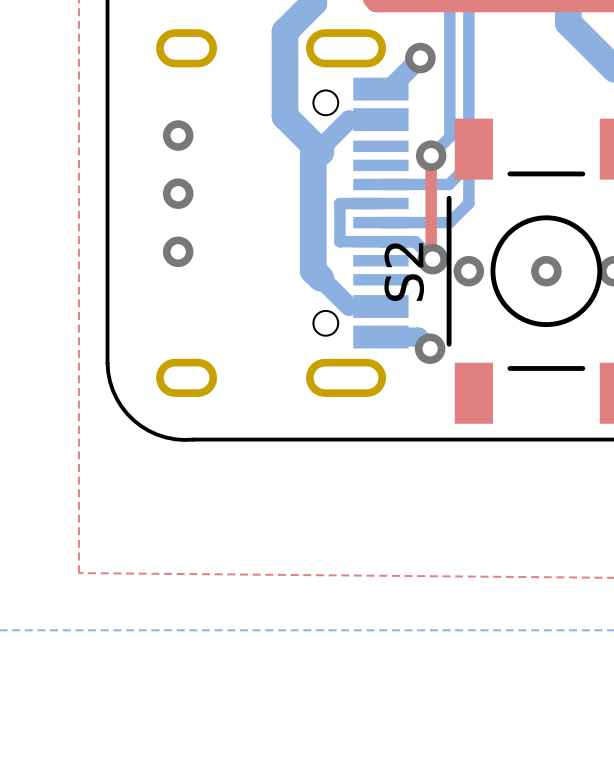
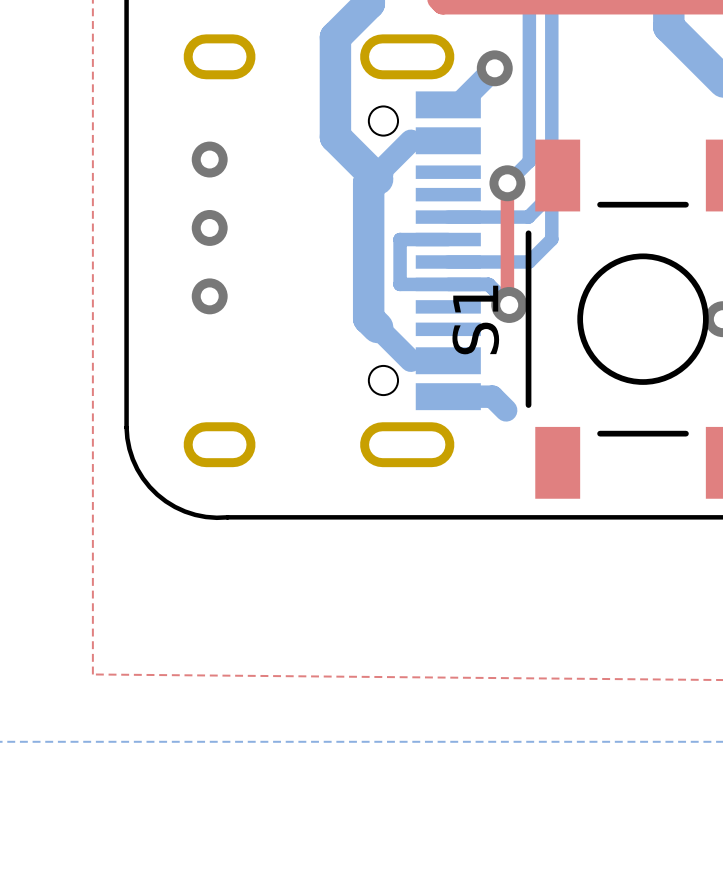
via: (468, 271) -> none
via: (546, 271) -> none
S2 name: S2 (404, 272) -> S1 (475, 319)
via: (430, 348) -> none

